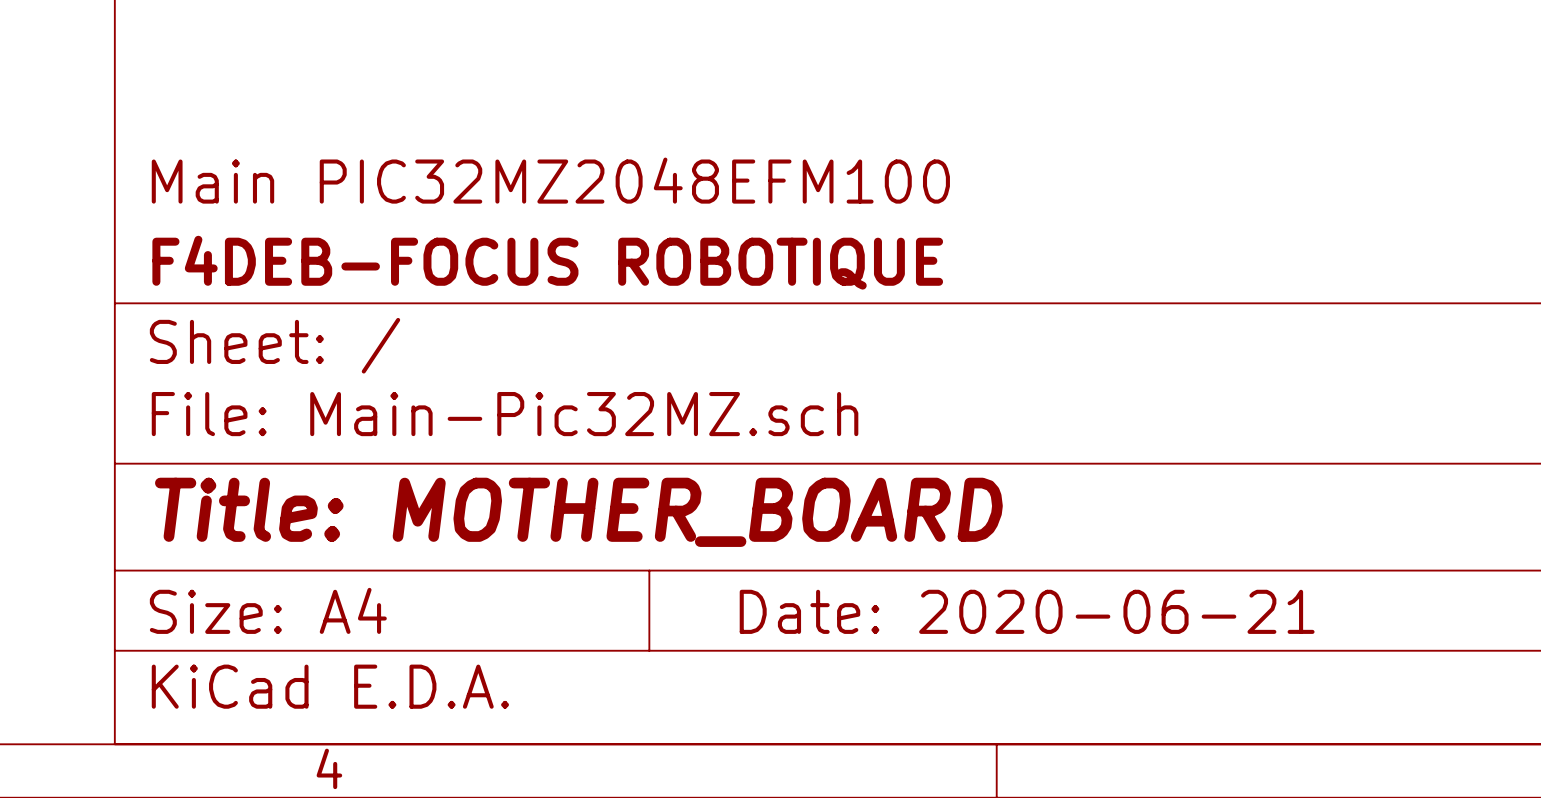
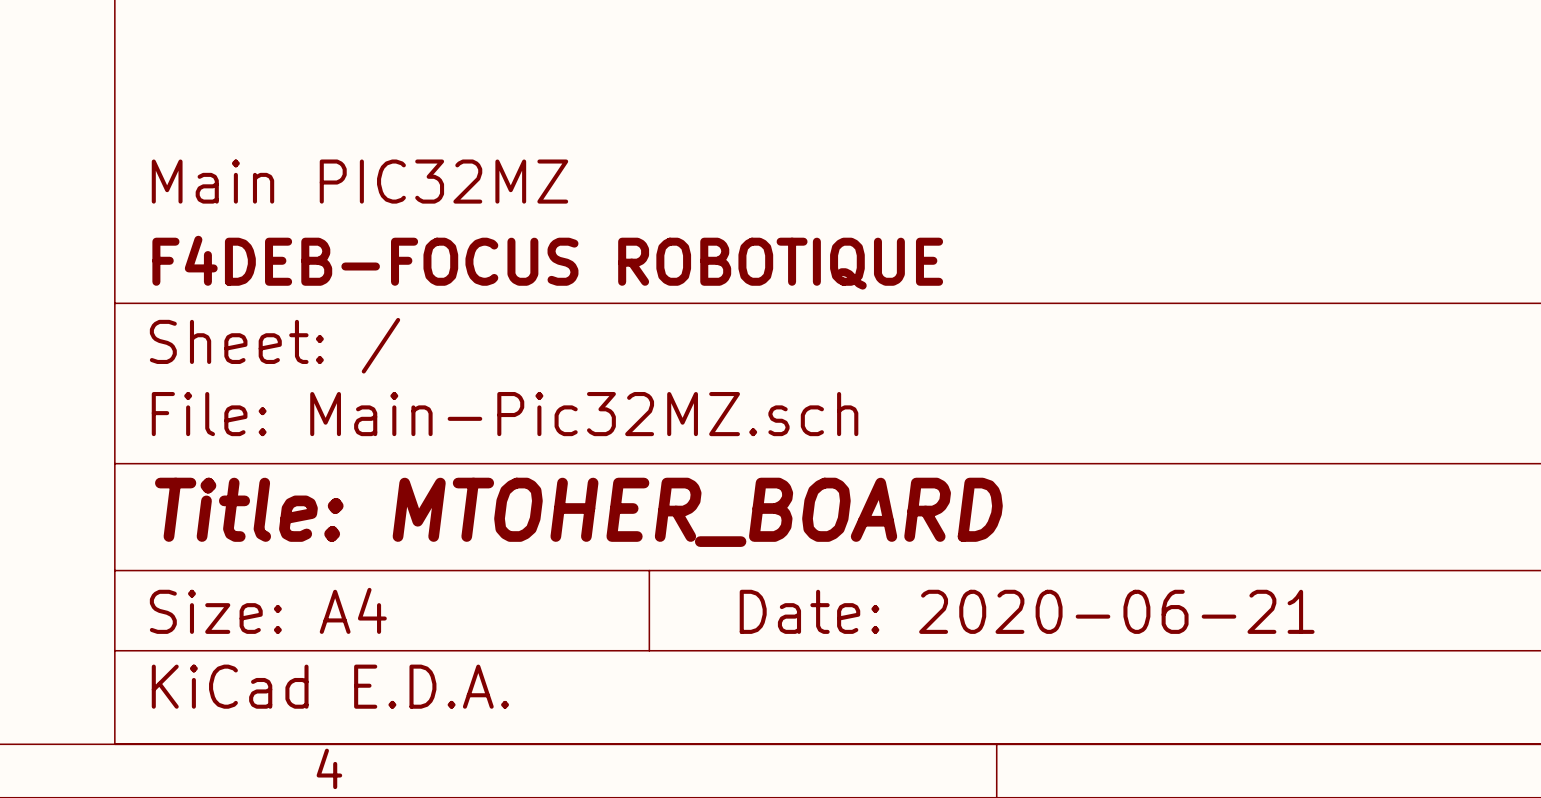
title block: Main PIC32MZ2048EFM100 (550, 180) -> Main PIC32MZ (359, 181)
title block: Title: MOTHER_BOARD (578, 512) -> Title: MTOHER_BOARD (578, 512)

